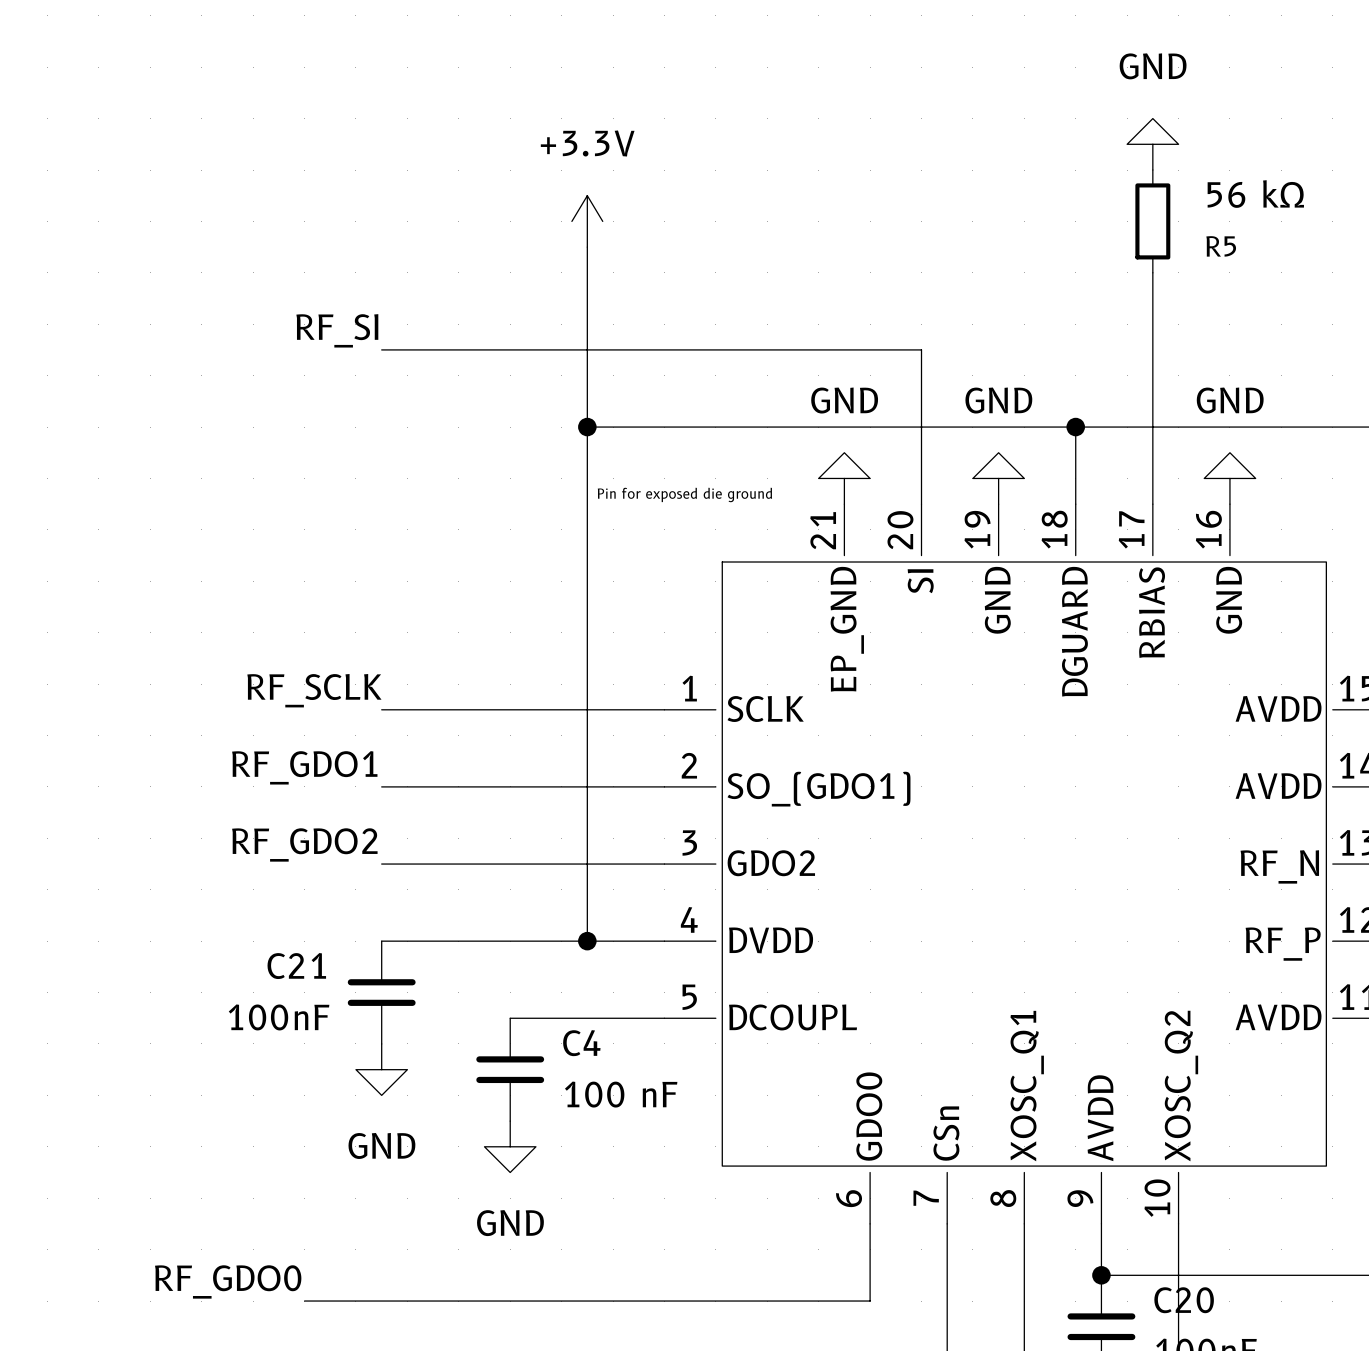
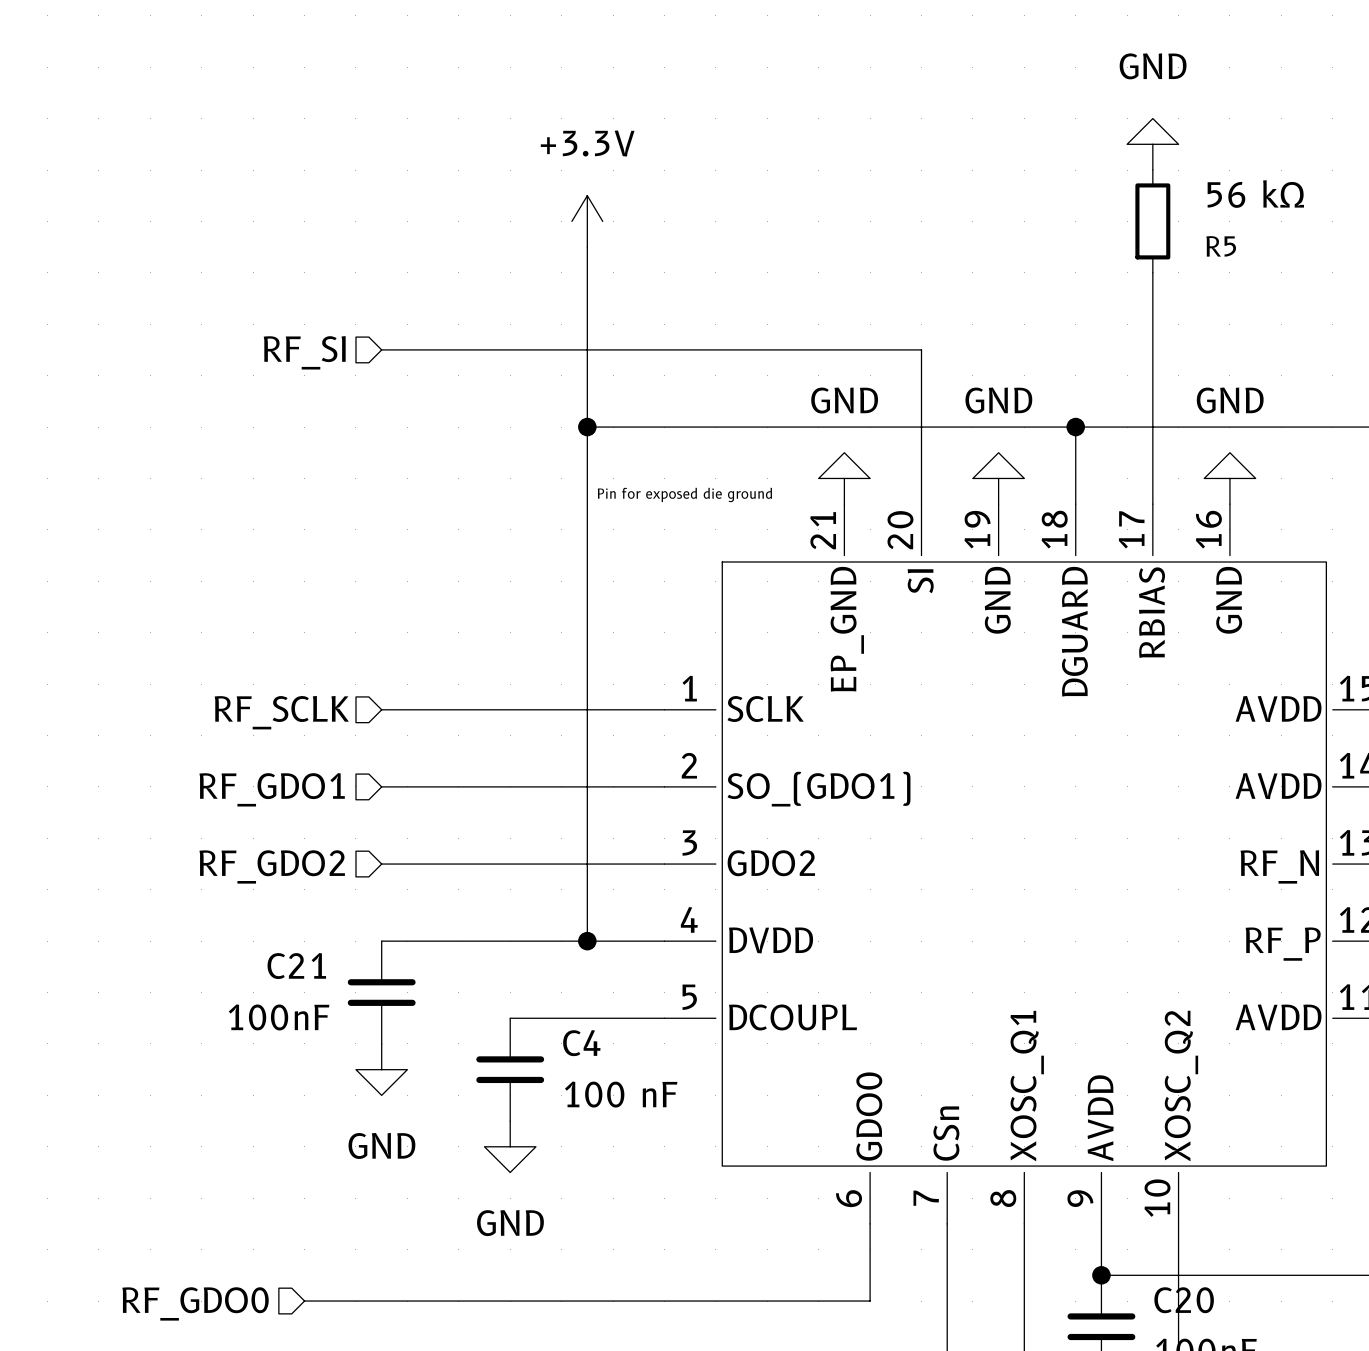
label: RF_SI (337, 330) -> none
hierarchical label: none -> RF_SI (304, 352)
label: RF_SCLK (314, 690) -> none
hierarchical label: none -> RF_SCLK (281, 712)
label: RF_GDO1 (304, 767) -> none
hierarchical label: none -> RF_GDO1 (272, 789)
label: RF_GDO2 (304, 844) -> none
hierarchical label: none -> RF_GDO2 (272, 866)
label: RF_GDO0 (228, 1281) -> none
hierarchical label: none -> RF_GDO0 (195, 1303)

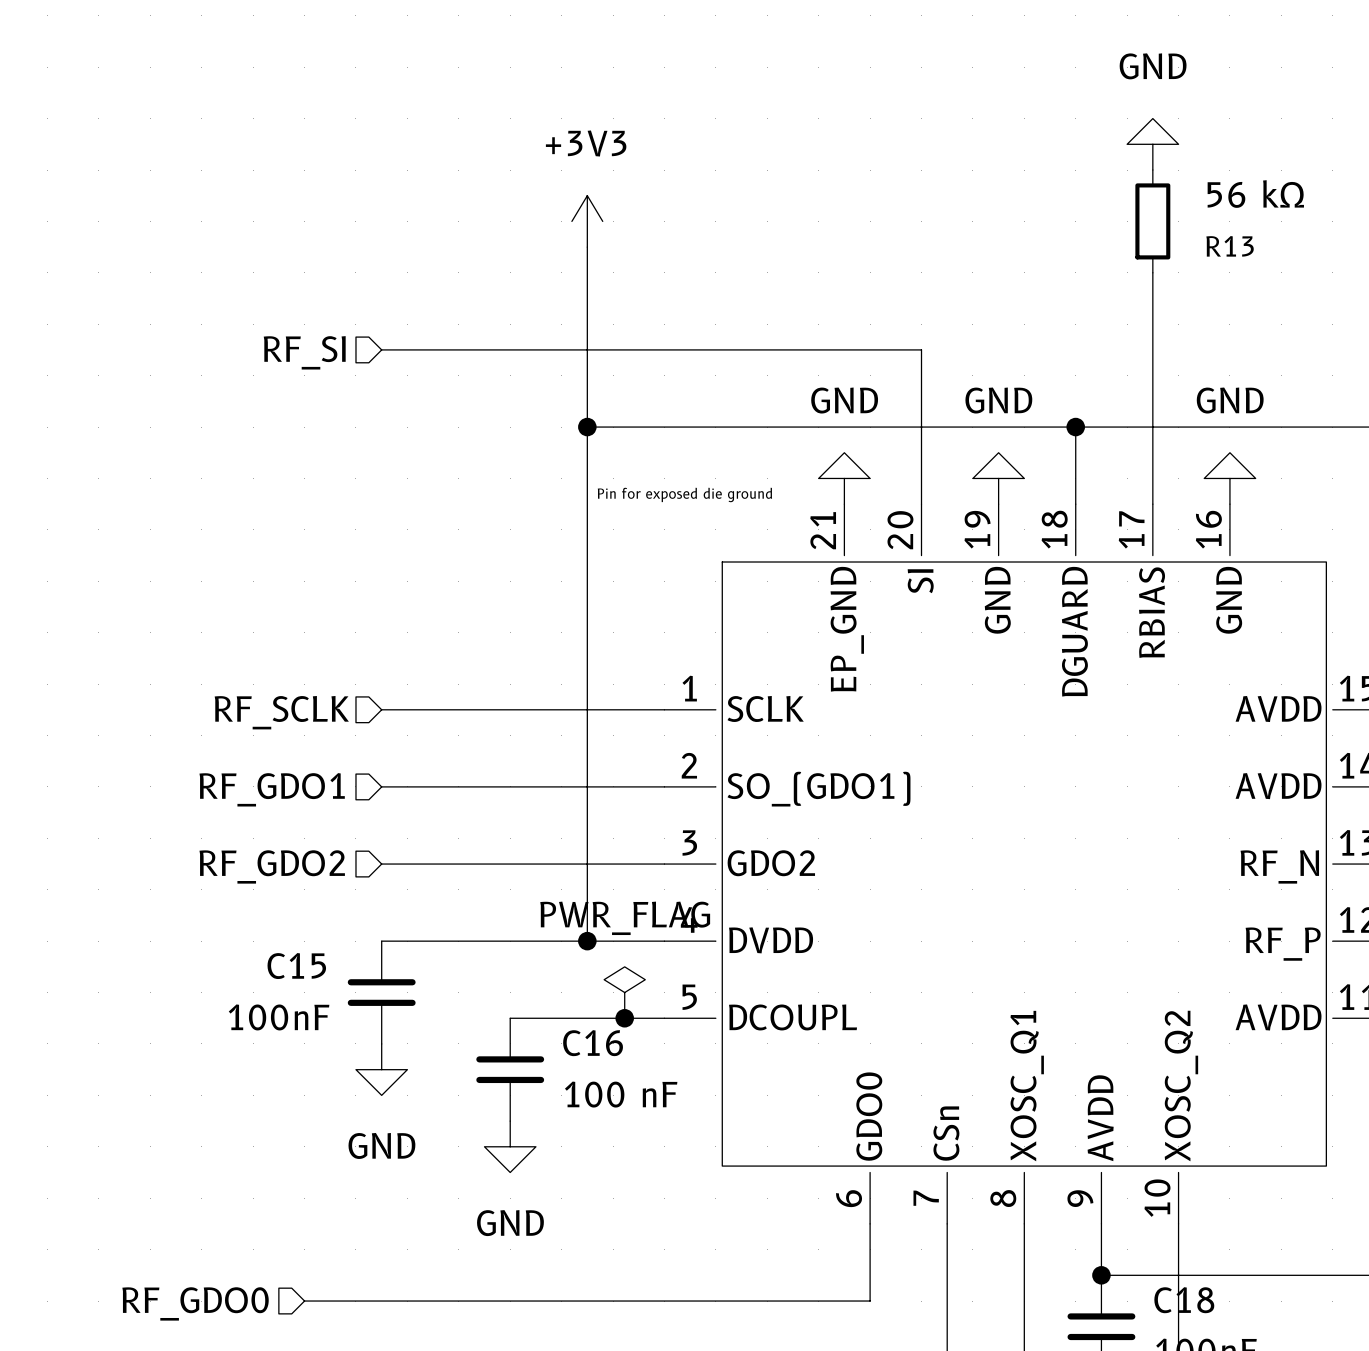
power symbol: +3.3V (587, 221) -> +3V3 (587, 221)
R5 name: R5 (1221, 246) -> R13 (1230, 246)
C21 name: C21 (296, 966) -> C15 (296, 966)
power symbol: none -> PWR_FLAG (624, 992)
junction: none -> (624, 1018)
C4 name: C4 (581, 1043) -> C16 (593, 1043)
C20 name: C20 (1184, 1300) -> C18 (1184, 1300)

